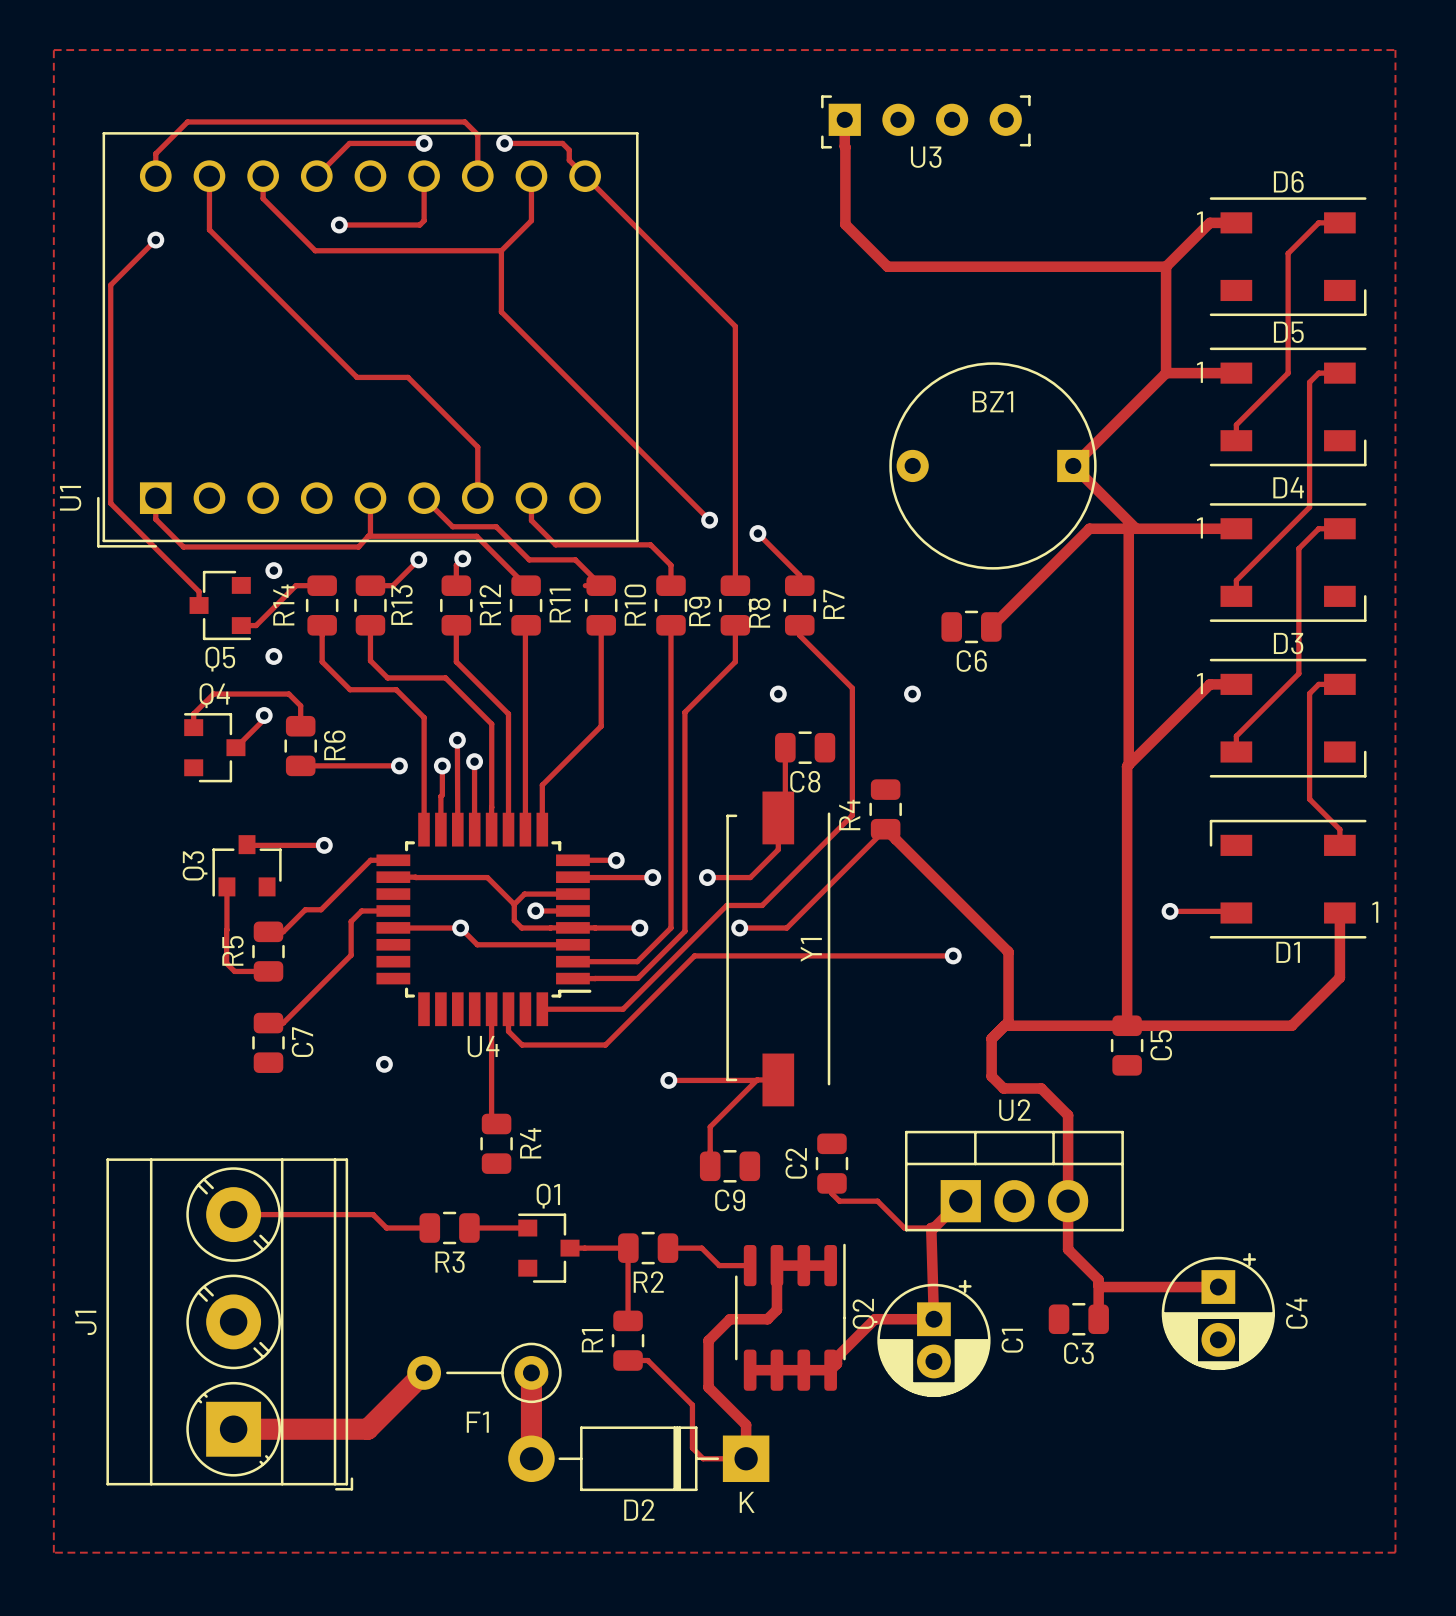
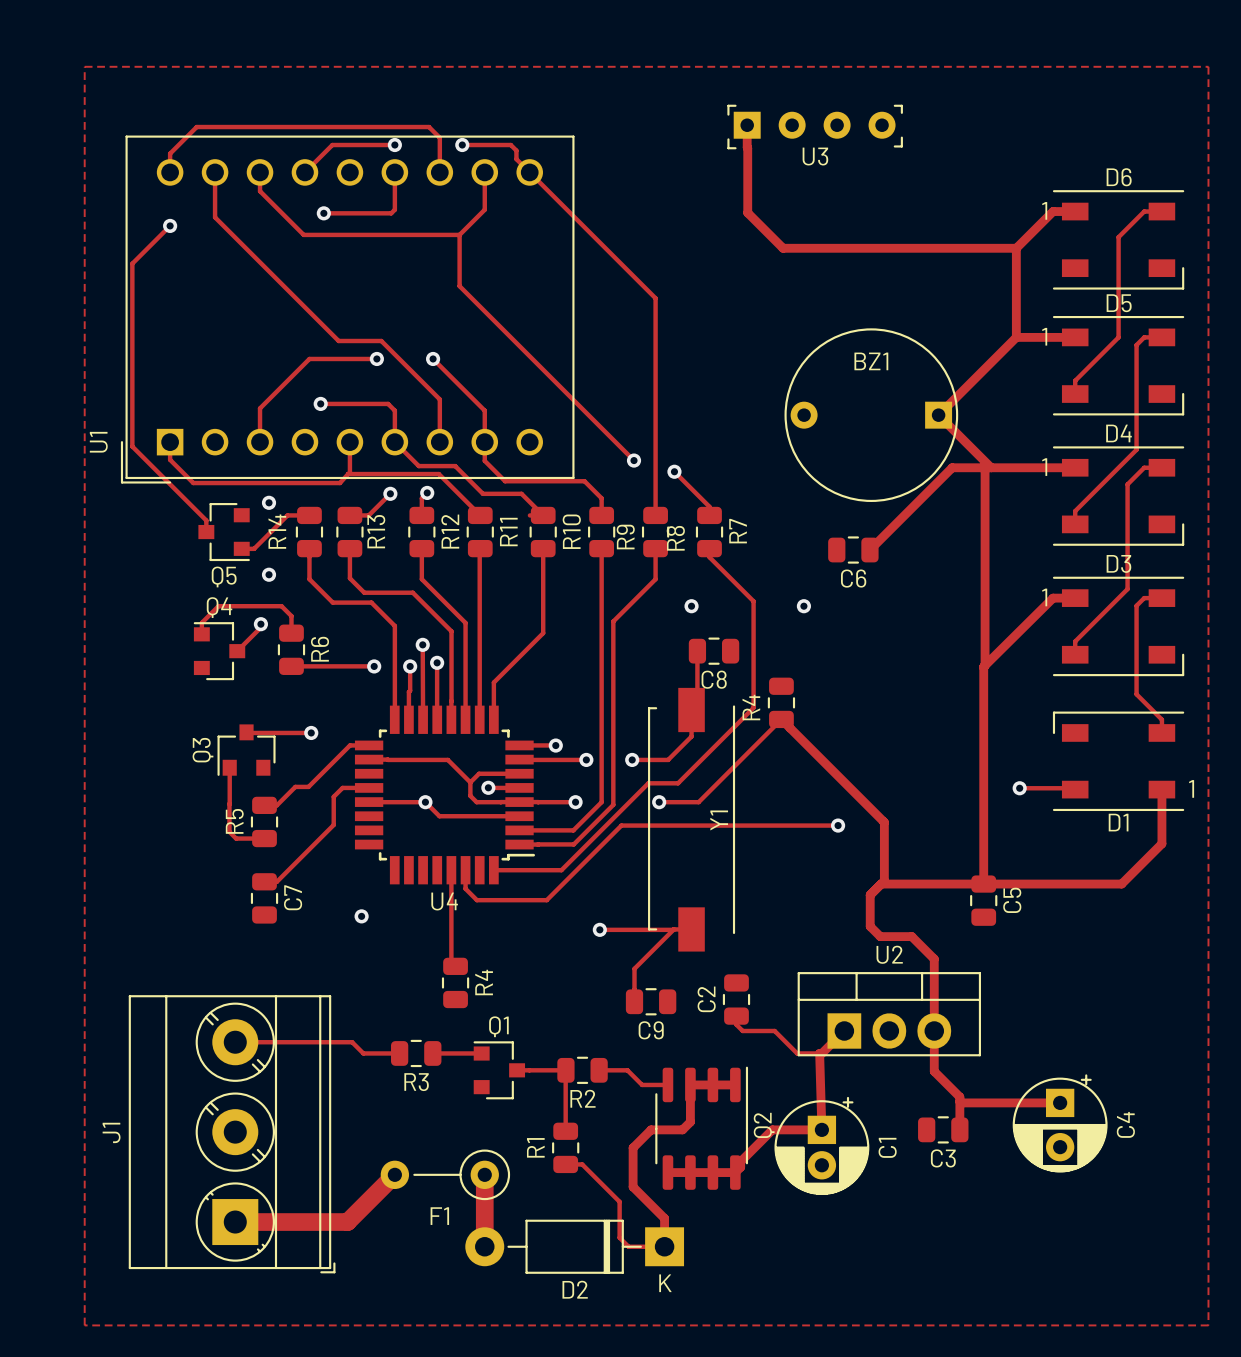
track: none -> (376, 358) (309, 358) (260, 408) (260, 442)
via: none -> (376, 358)
track: none -> (433, 358) (484, 410) (484, 442)
via: none -> (433, 358)
track: none -> (320, 403) (388, 403) (394, 410) (394, 433)
via: none -> (320, 403)

